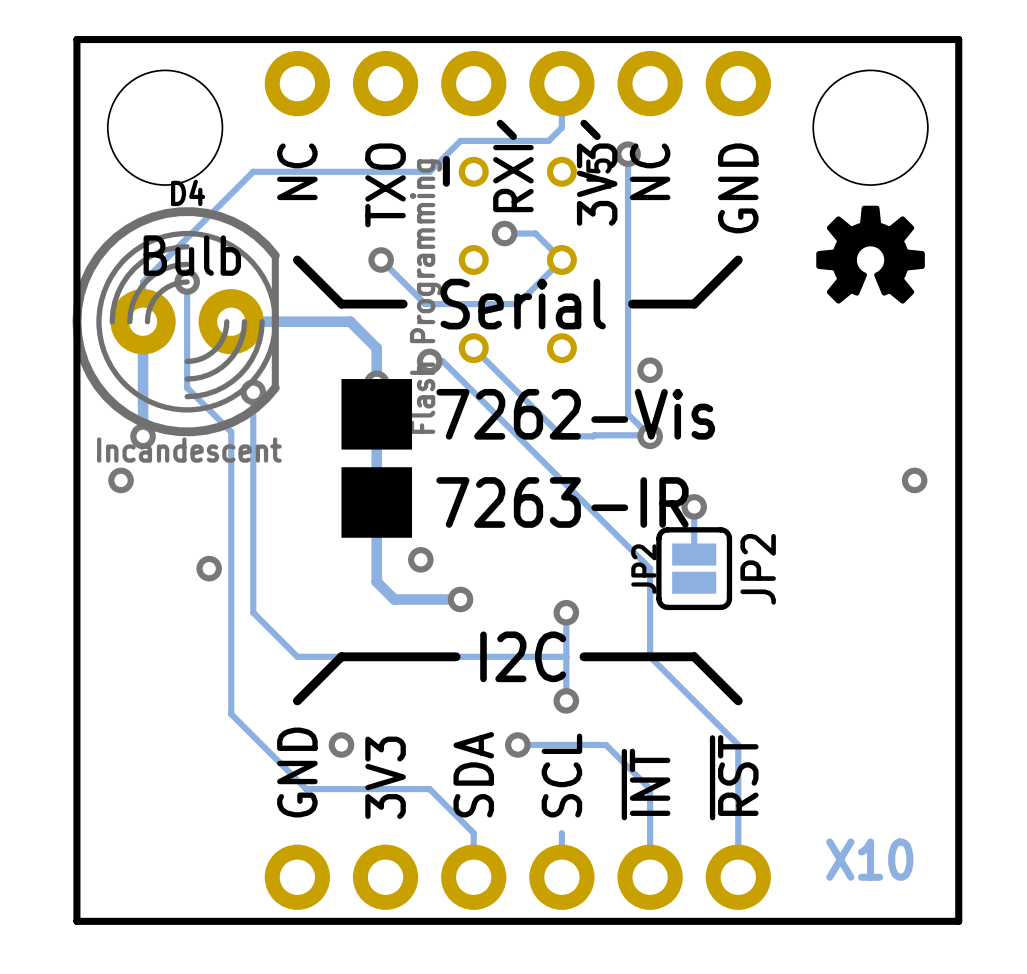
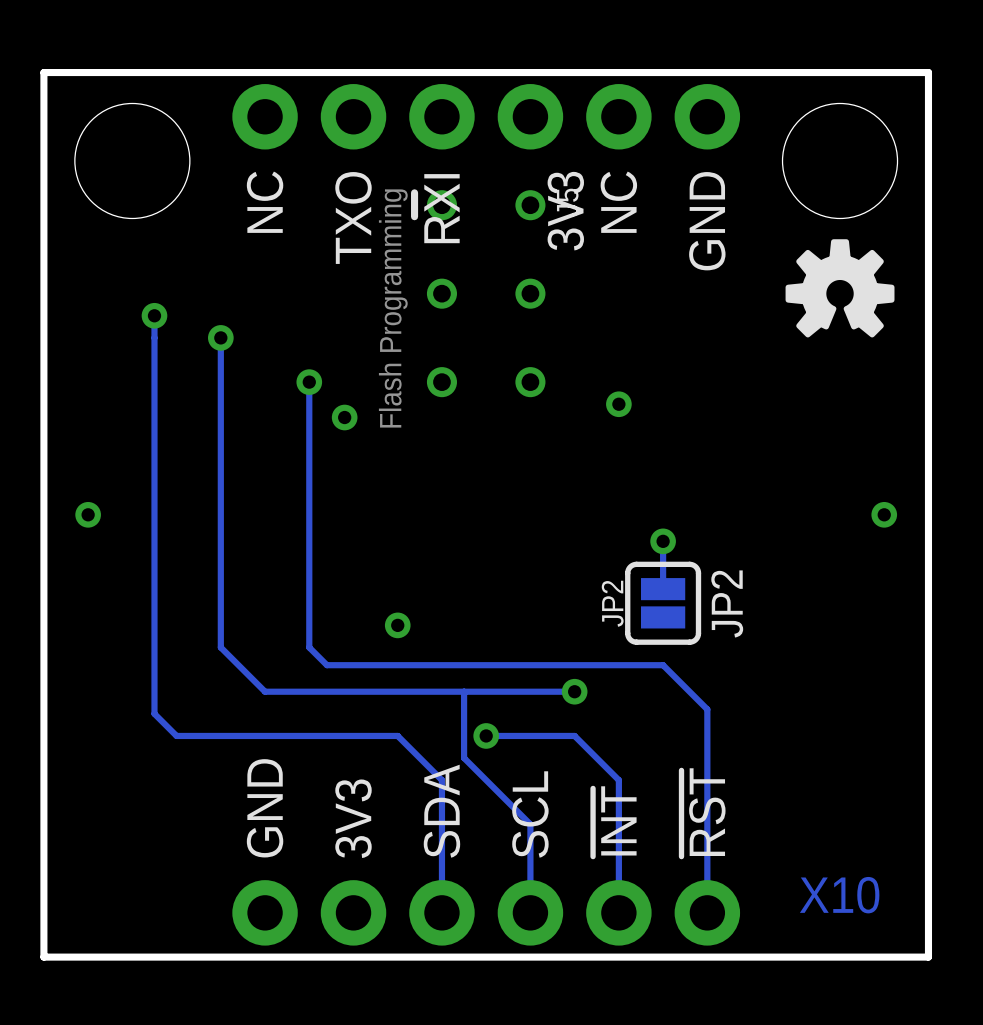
track: (561, 83) (561, 127) (548, 140) (460, 140) (429, 171) (253, 171) (143, 282) (143, 436) -> none
line: (500, 123) (513, 136) -> none
line: (583, 123) (597, 136) -> none
track: (628, 154) (628, 414) (650, 436) -> none
via: (628, 154) -> none
text position: RXI (513, 178) -> RXI (441, 208)
track: (504, 233) (535, 233) (561, 259) (517, 304) (425, 304) (381, 259) -> none
via: (504, 233) -> none
text: Bulb (192, 255) -> none
line: (297, 259) (341, 304) (403, 304) -> none
via: (381, 259) -> none
line: (738, 259) (694, 304) (632, 304) -> none
via: none -> (220, 337)
text: Serial (523, 304) -> none
D4: Incandescent (176, 321) -> none
track: (231, 321) (350, 321) (376, 348) (376, 581) (394, 599) (460, 599) -> none
via: none -> (309, 382)
track: (473, 348) (561, 436) (649, 435) -> none
track: (429, 361) (442, 361) (650, 568) (650, 656) (738, 744) -> (309, 382) (309, 647) (326, 665) (663, 665) (707, 709) (707, 780)
via: (429, 361) -> none
drawing: [341, 379, 413, 538] -> none
track: (187, 387) (231, 431) (231, 714) (306, 789) (429, 789) (473, 833) -> (154, 421) (154, 713) (176, 735) (397, 735) (441, 780) (441, 868)
via: (253, 392) -> none
text: 7262-Vis (575, 414) -> none
via: (143, 436) -> none
via: (650, 436) -> none
text: 7263-IR (562, 502) -> none
via: (420, 559) -> none
via: (209, 568) -> none
via: none -> (397, 625)
via: (460, 599) -> none
track: (566, 612) (566, 700) -> (220, 337) (220, 426)
via: (566, 612) -> none
line: (456, 656) (341, 656) (297, 700) -> none
track: none -> (464, 691) (464, 758) (530, 824) (530, 868)
text: I2C (523, 656) -> none
line: (583, 656) (694, 656) (738, 700) -> none
track: none -> (574, 691) (534, 691)
via: none -> (574, 691)
via: none -> (486, 735)
via: (566, 700) -> none
via: (341, 744) -> none
track: (517, 744) (606, 744) (650, 789) -> (486, 735) (574, 735) (618, 780) (618, 824)
via: (517, 744) -> none

